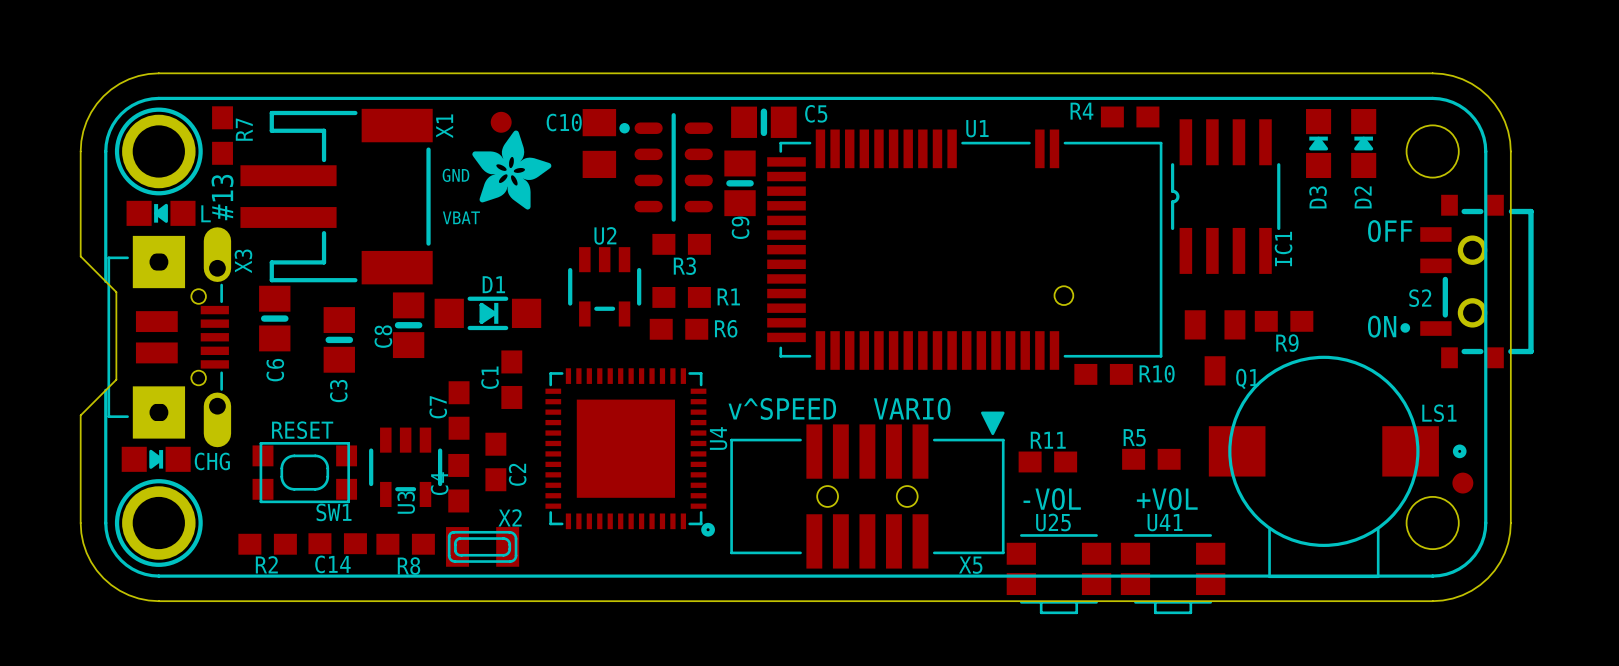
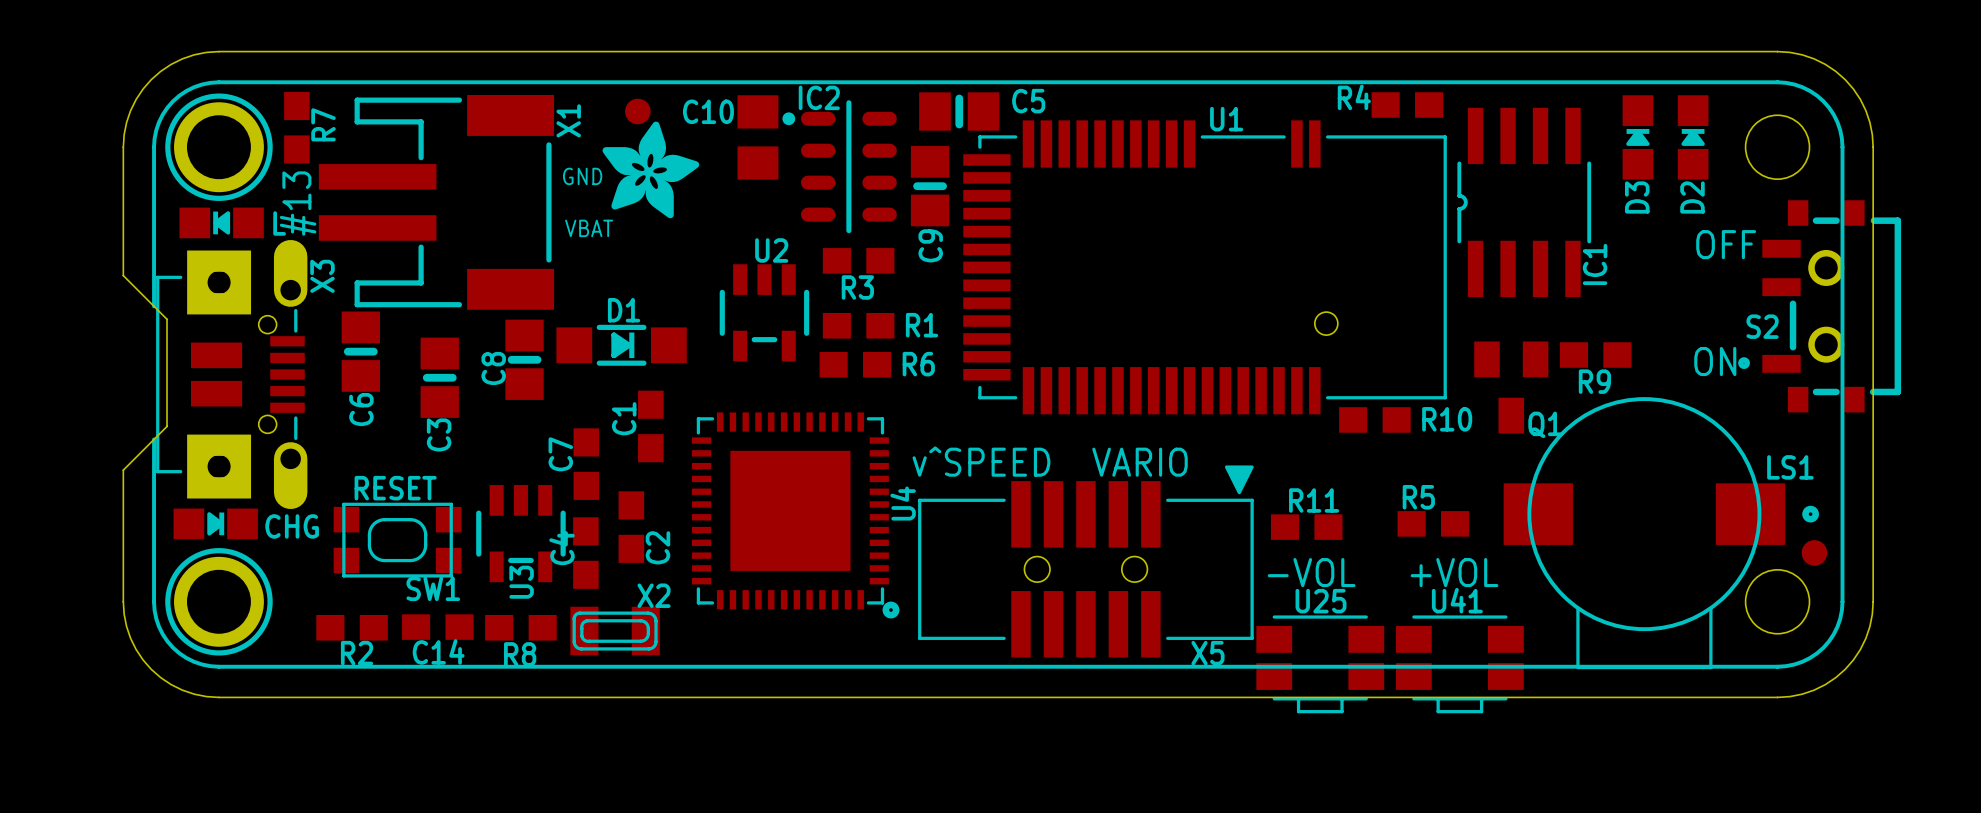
IC2 name: none -> IC2 (819, 97)

